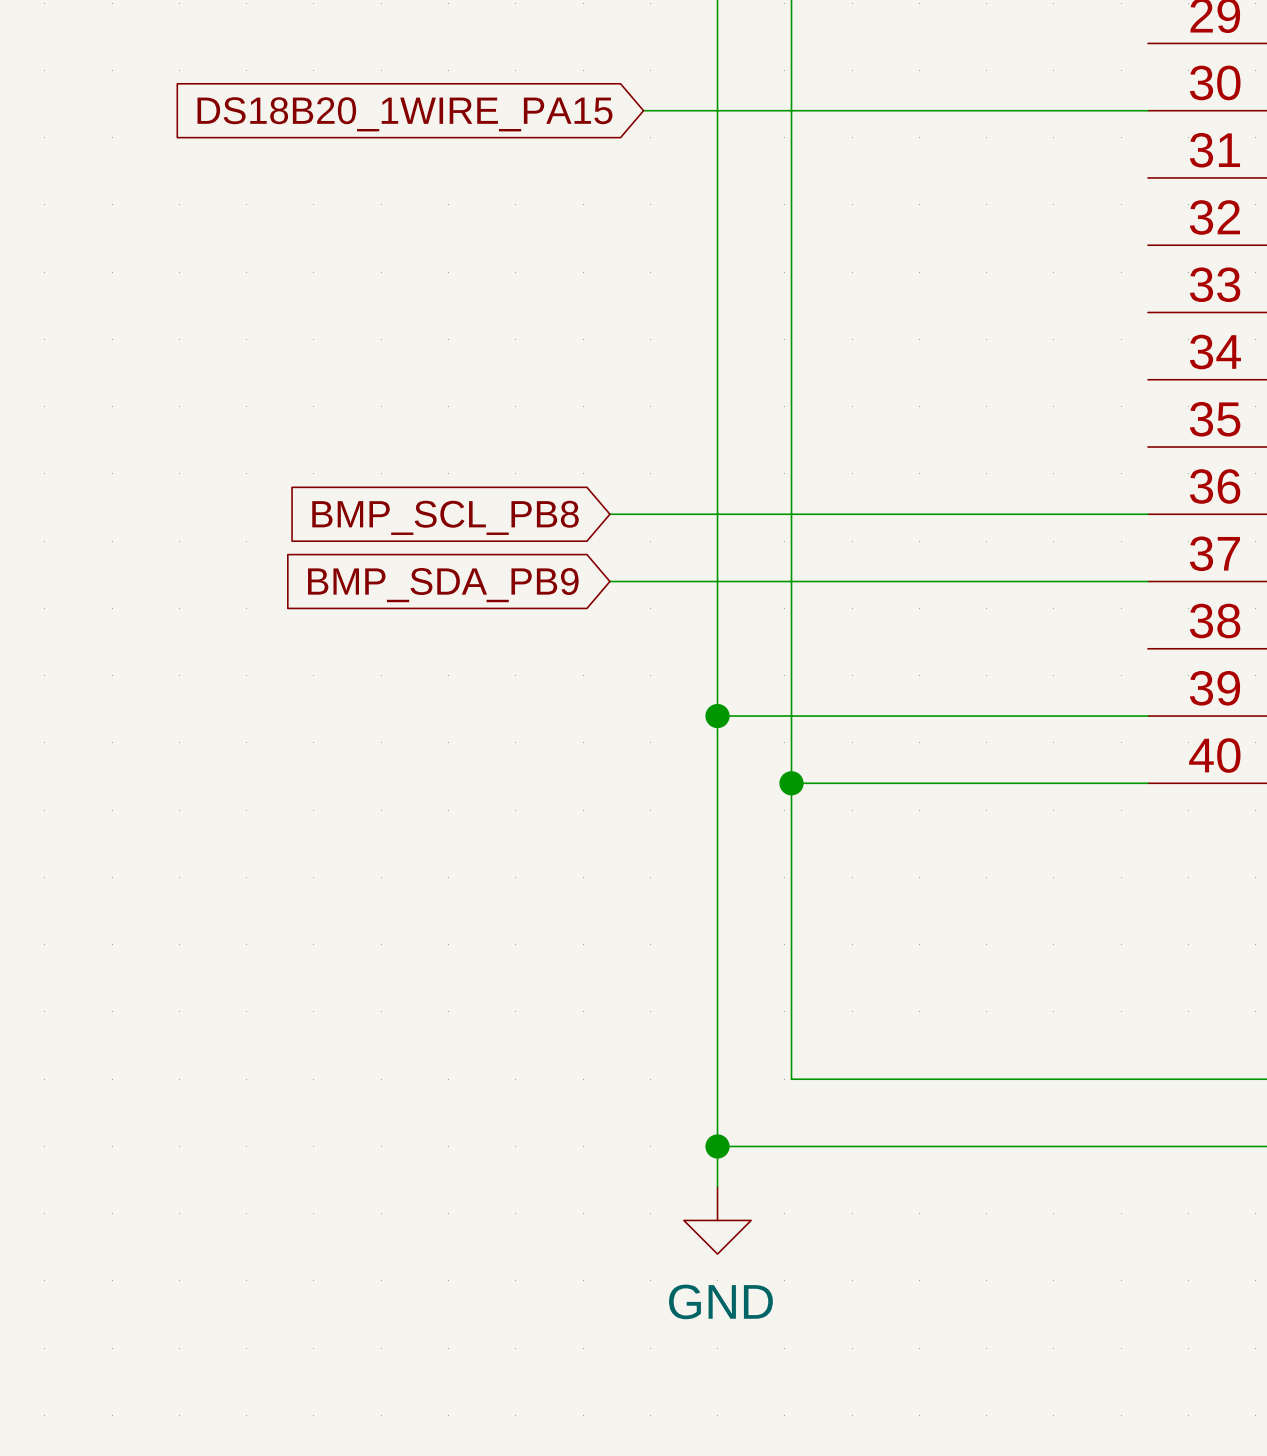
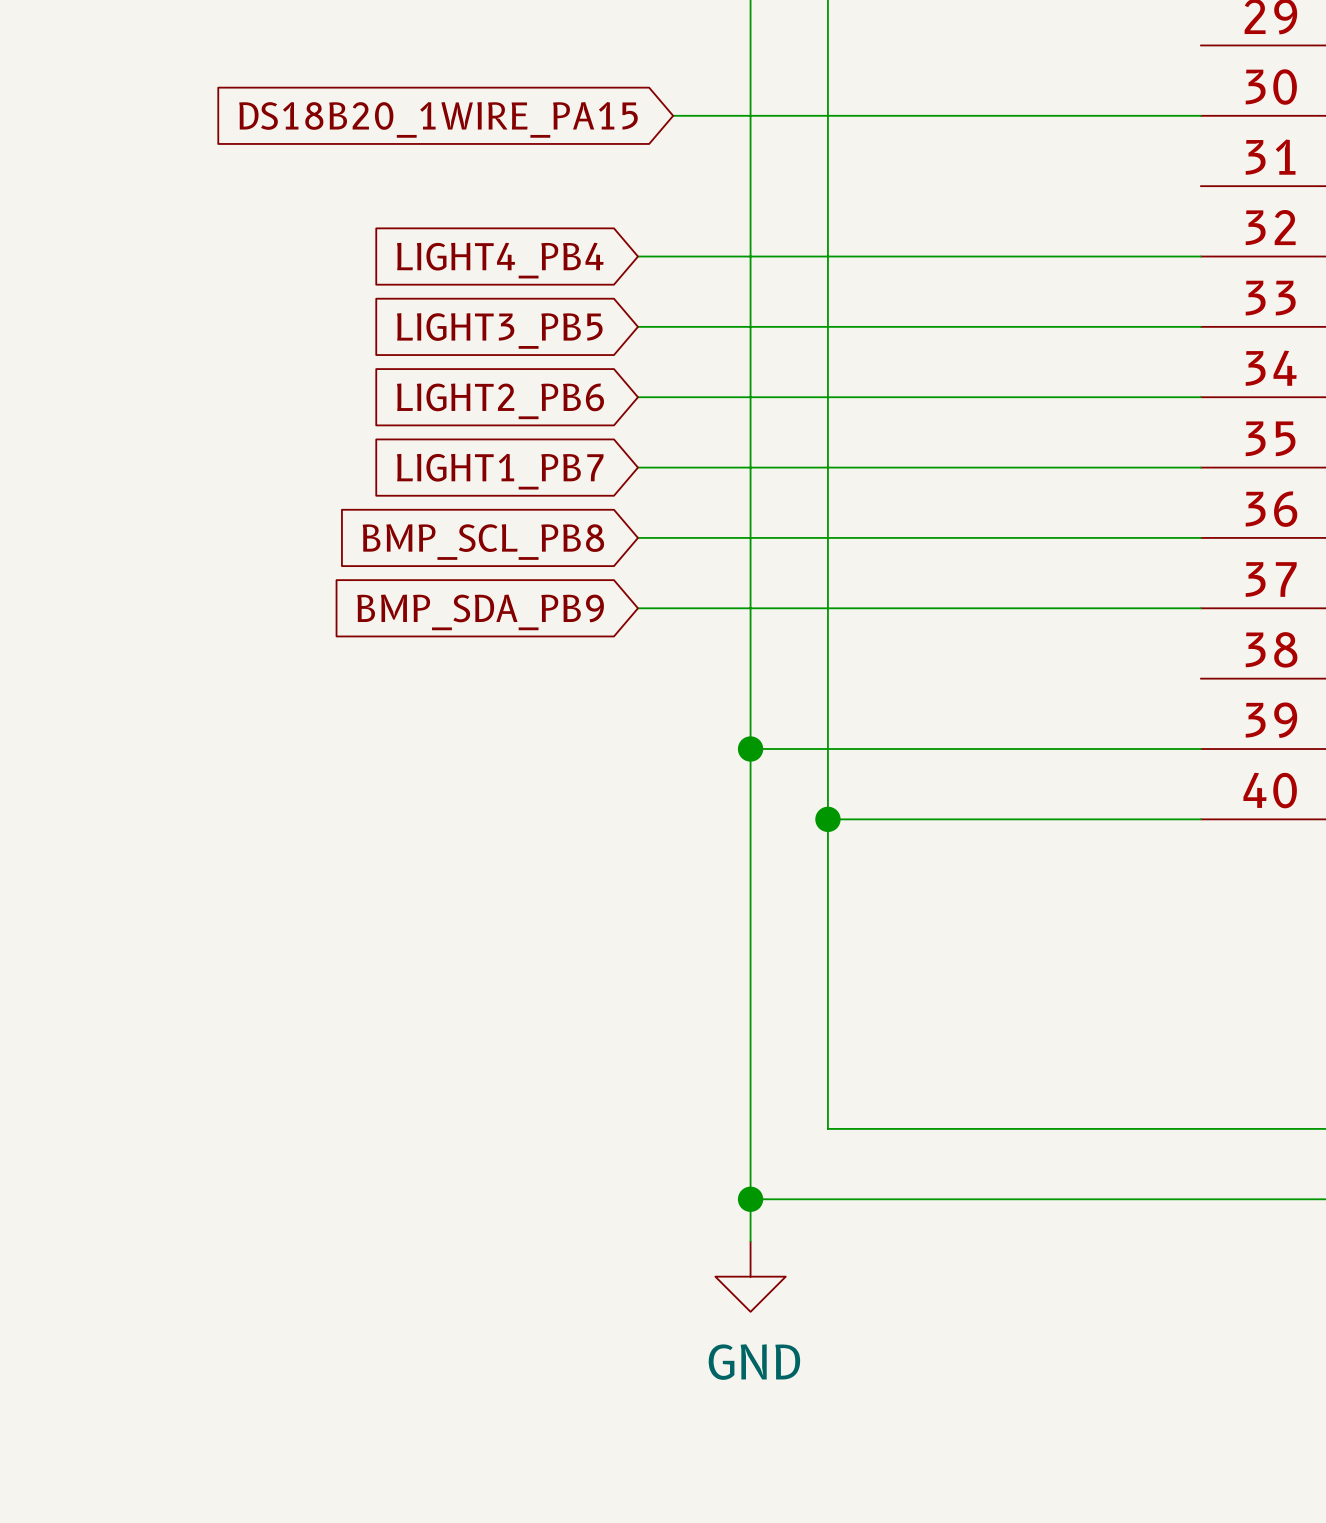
wire: none -> (638, 256) (1200, 256)
global label: none -> LIGHT4_PB4 (500, 260)
wire: none -> (638, 326) (1200, 326)
global label: none -> LIGHT3_PB5 (499, 330)
wire: none -> (638, 397) (1200, 397)
global label: none -> LIGHT2_PB6 (500, 401)
wire: none -> (638, 467) (1200, 467)
global label: none -> LIGHT1_PB7 (500, 471)

